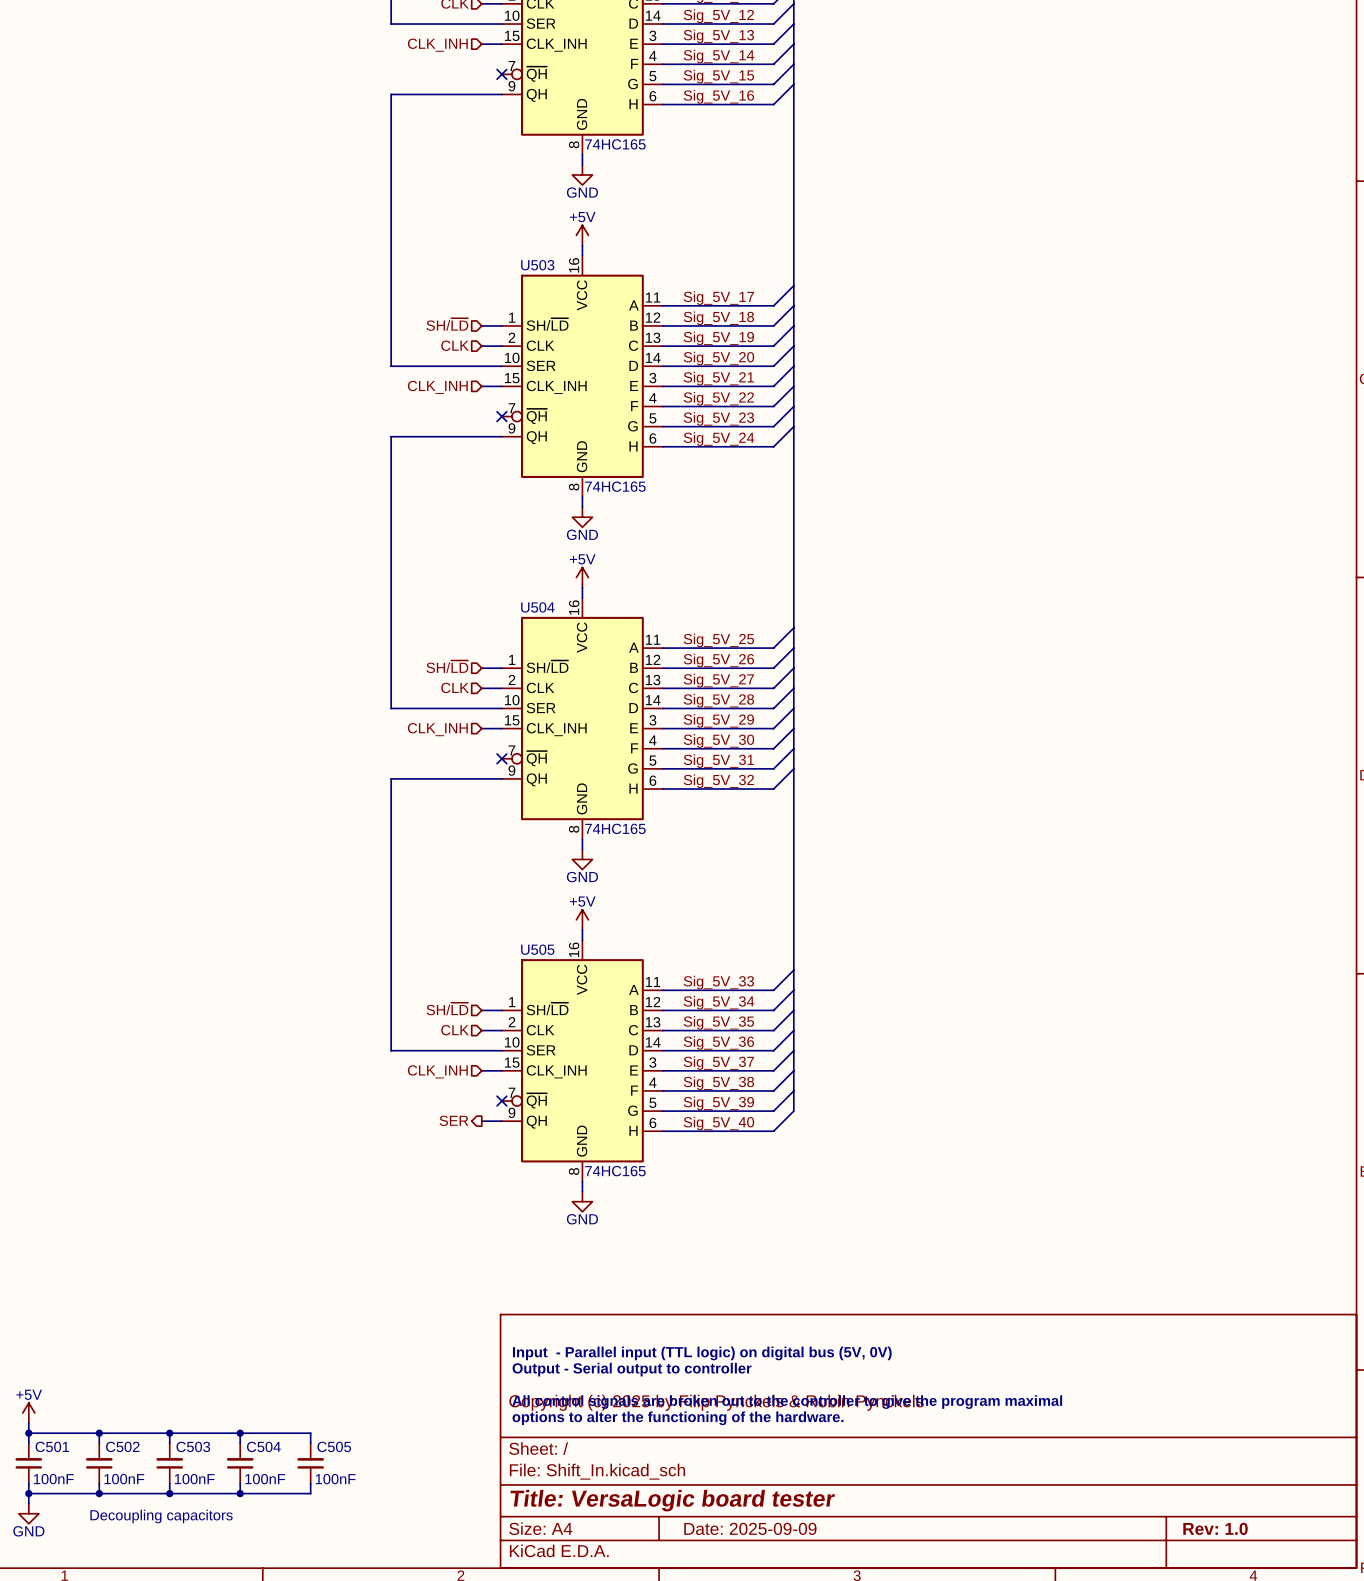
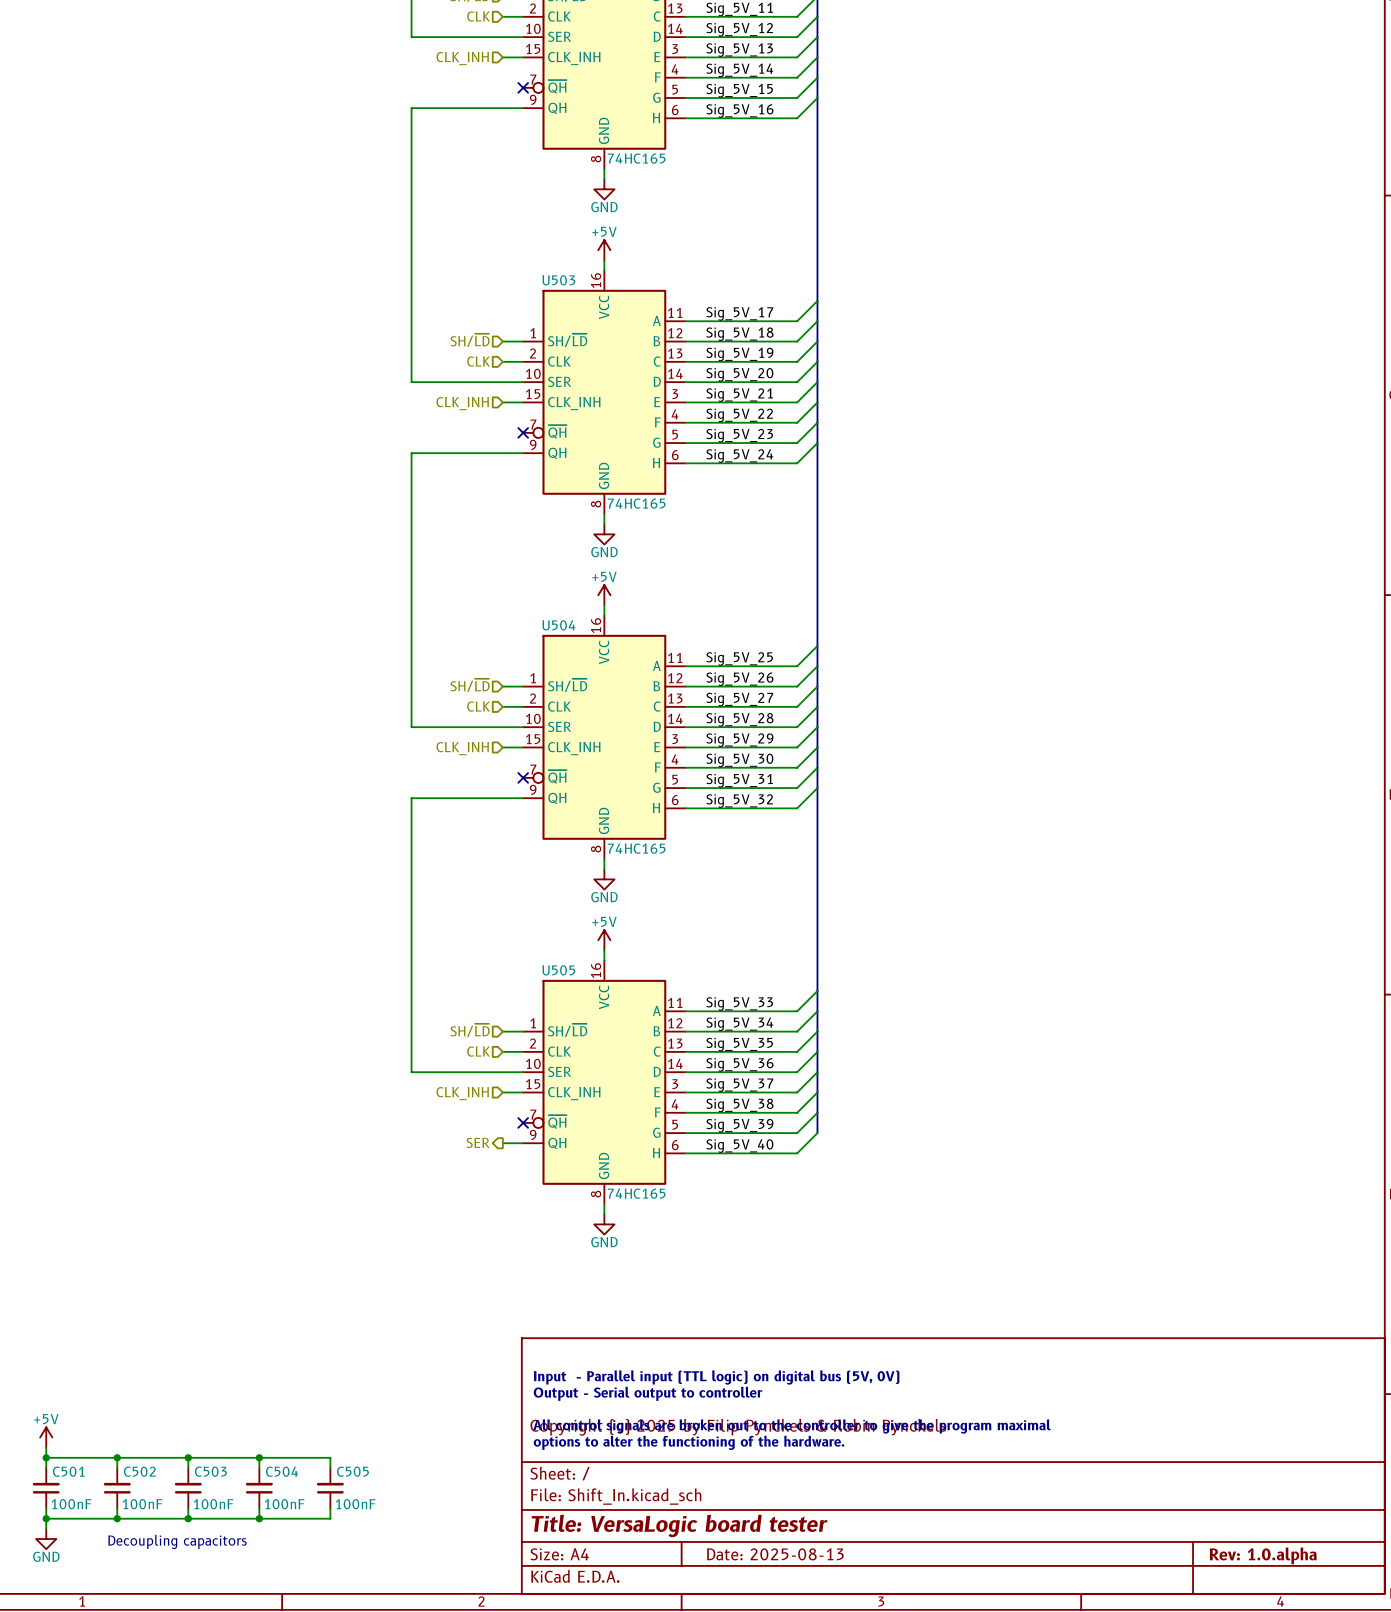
title block: Date: 2025-09-09 (750, 1528) -> Date: 2025-08-13 (775, 1554)
title block: Rev: 1.0 (1215, 1528) -> Rev: 1.0.alpha (1263, 1555)

